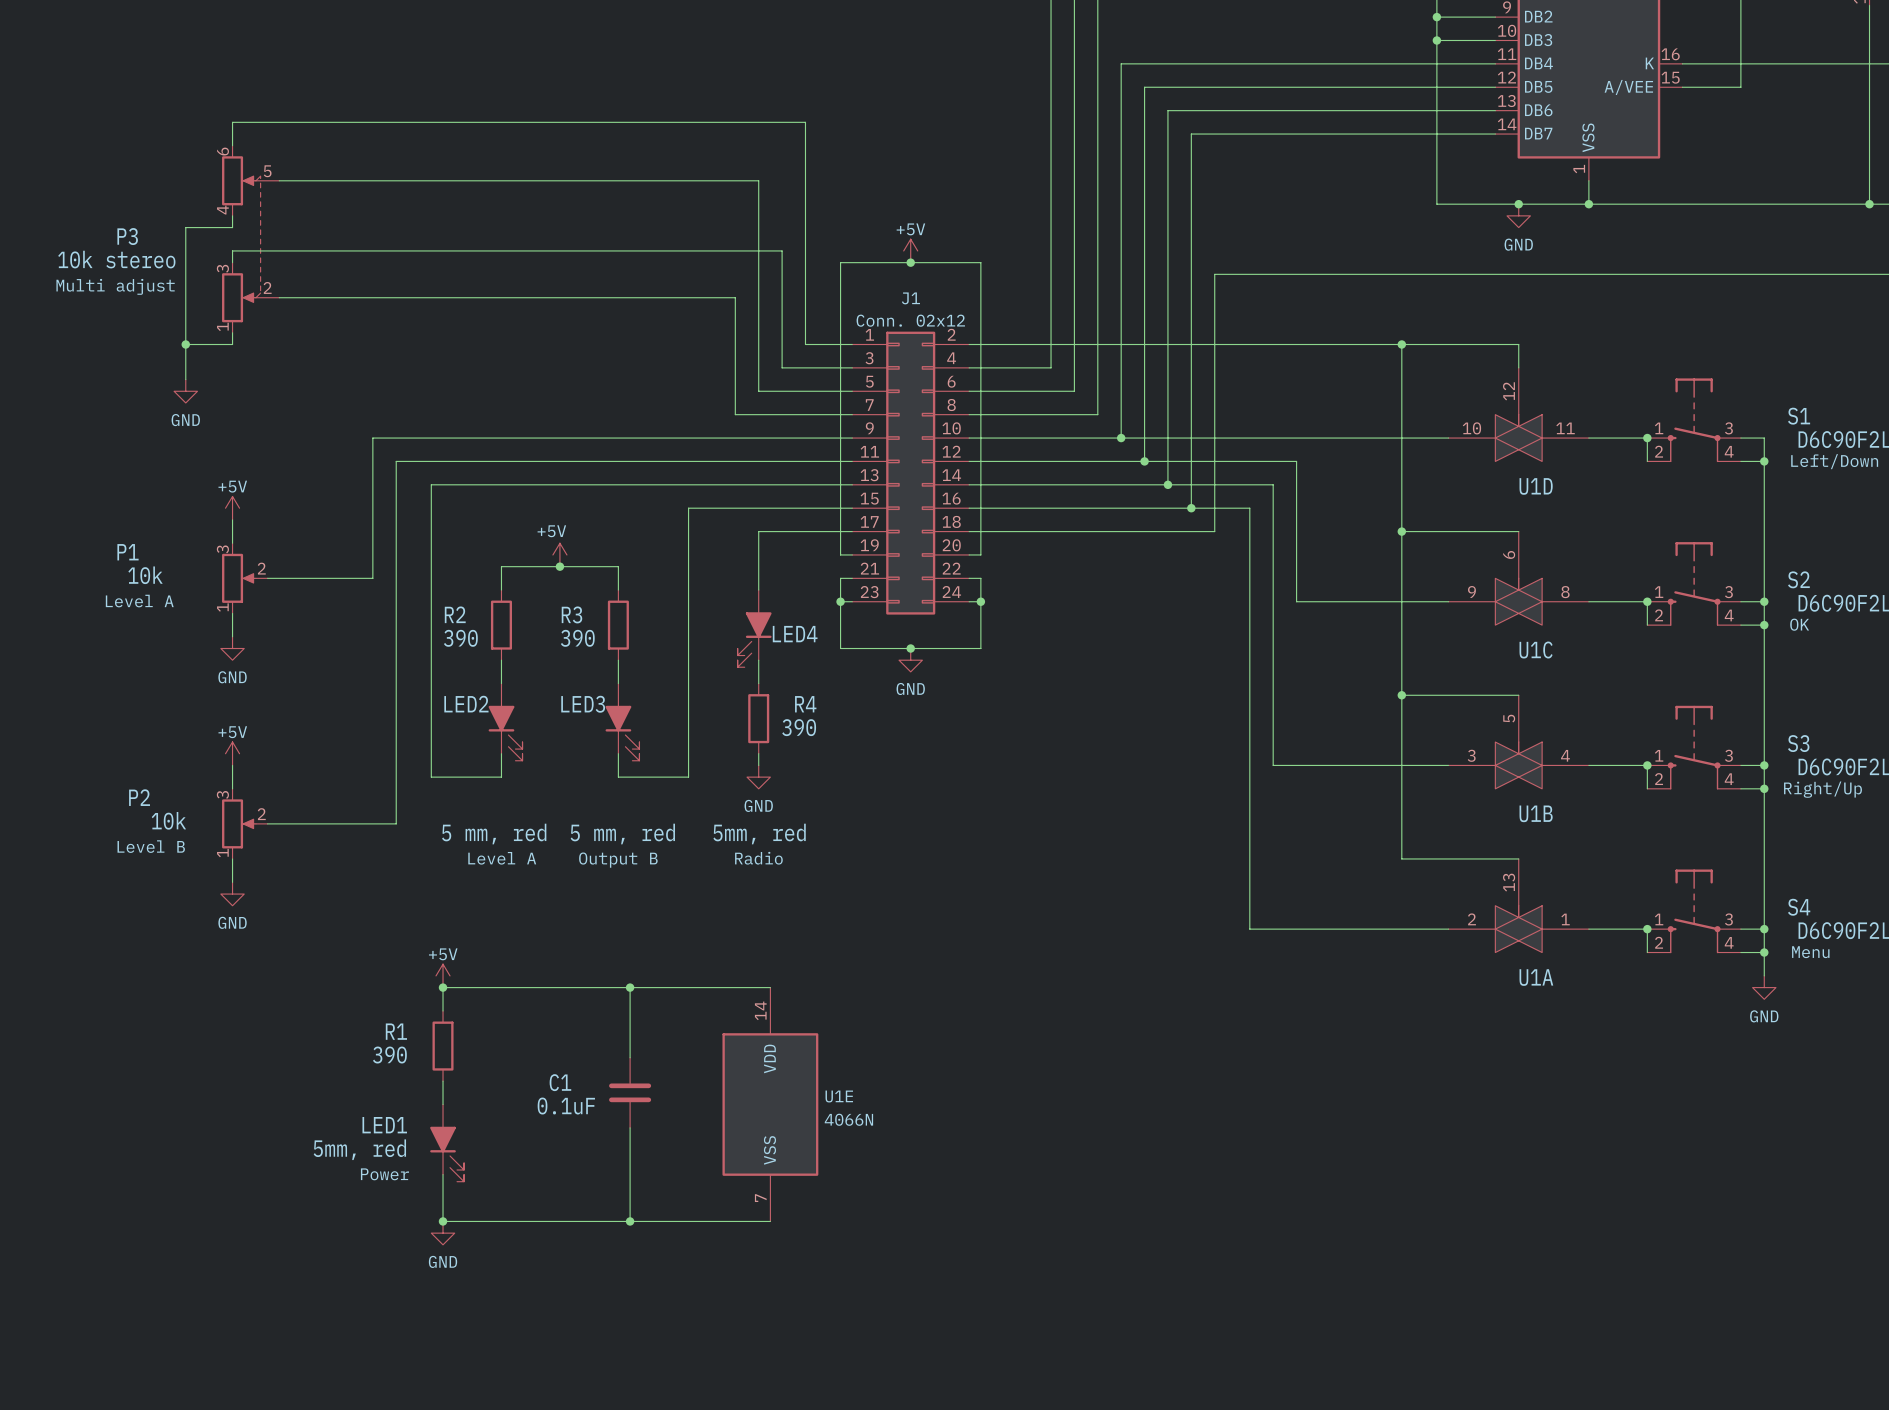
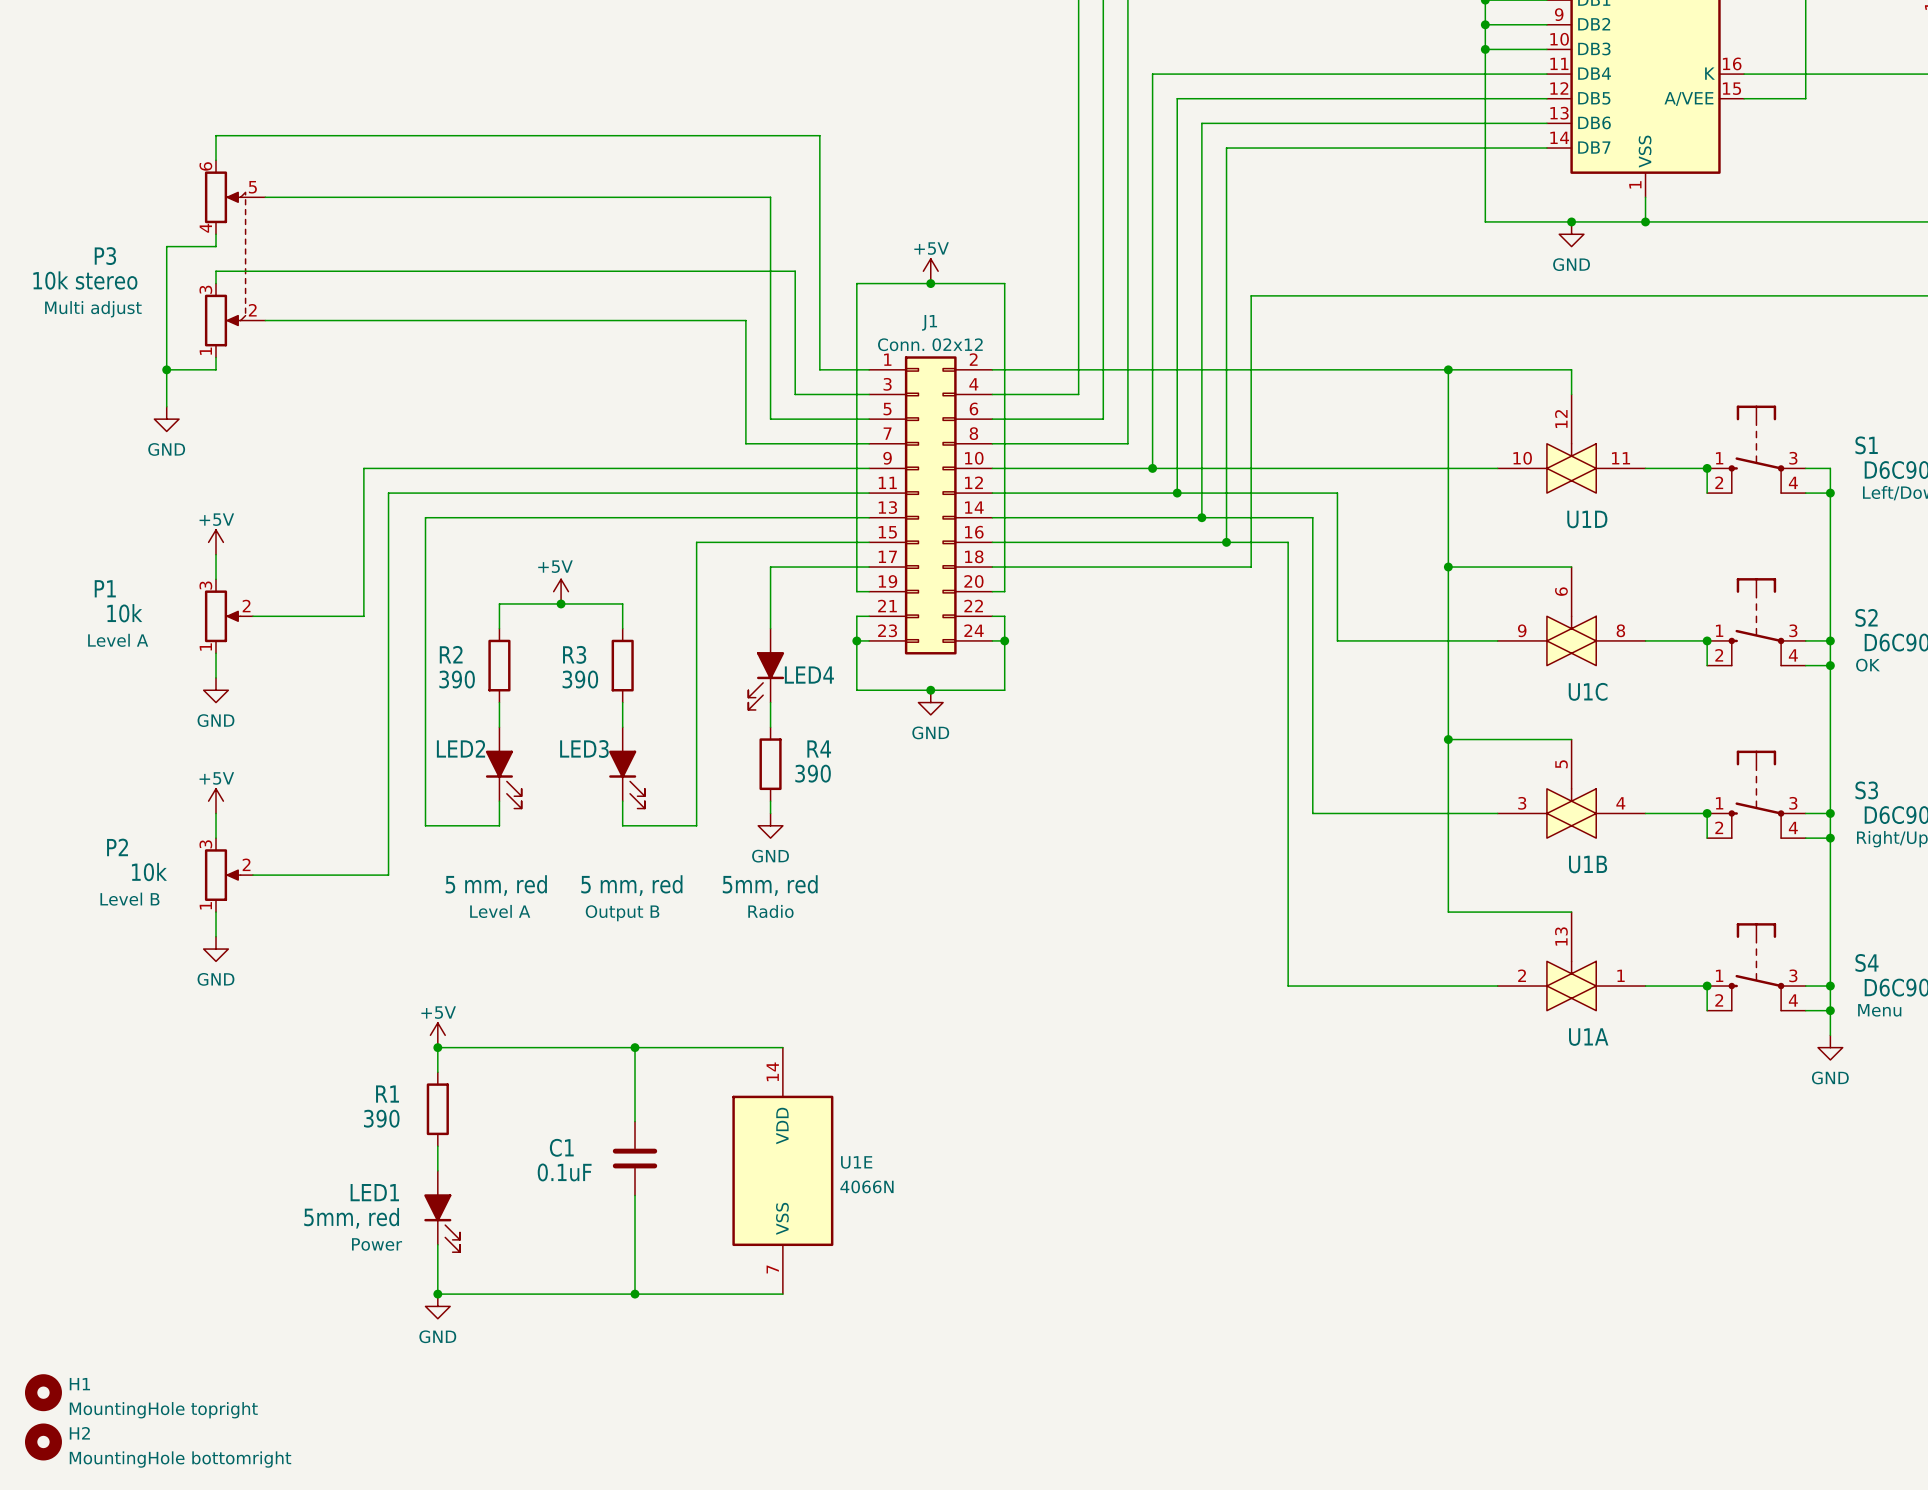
H1: none -> MountingHole topright (43, 1392)
H2: none -> MountingHole bottomright (43, 1441)

